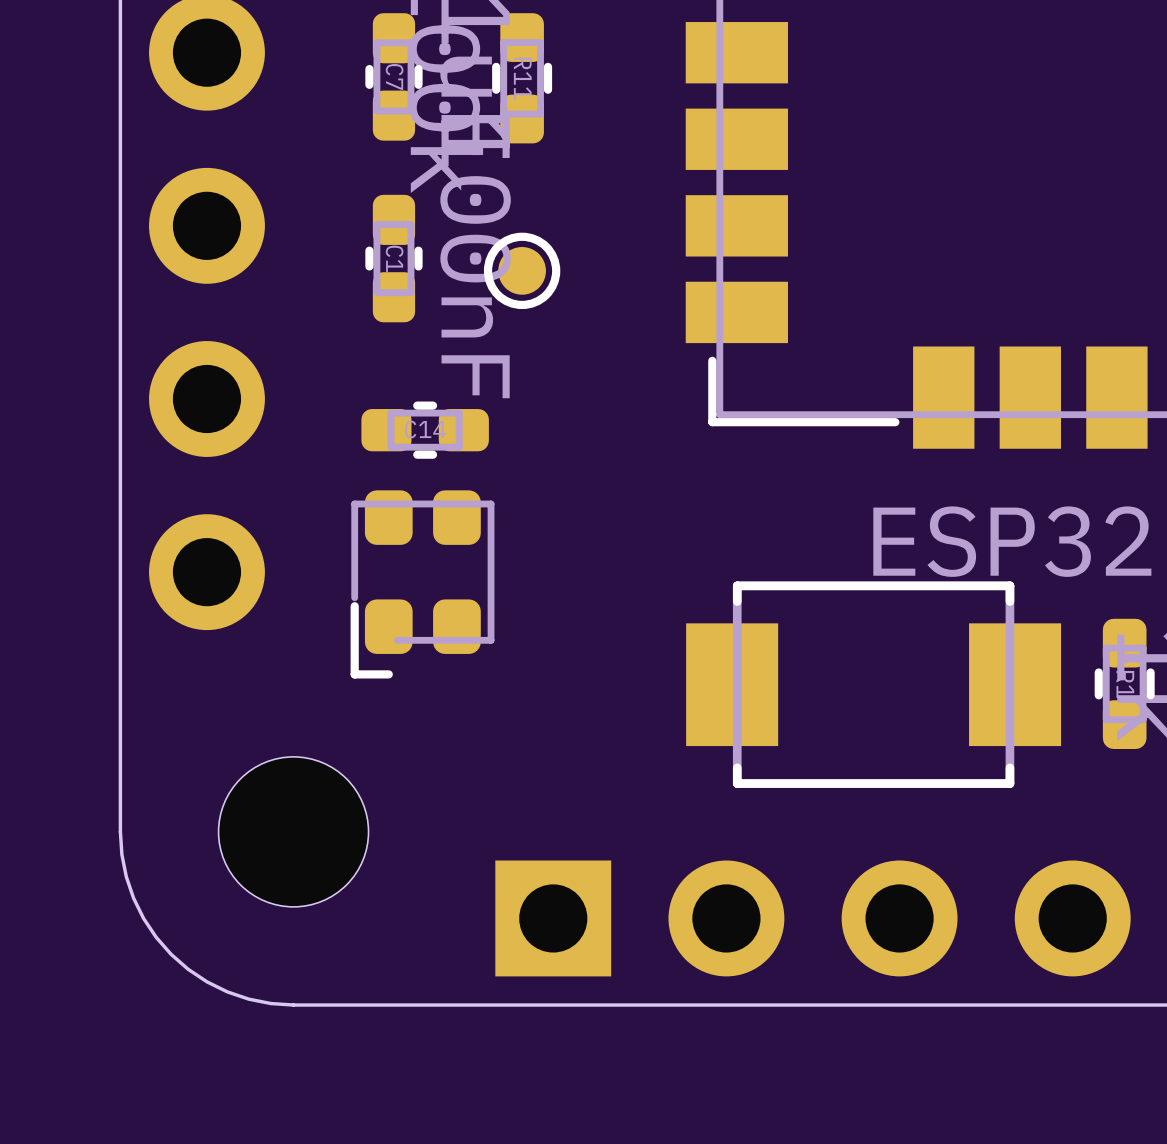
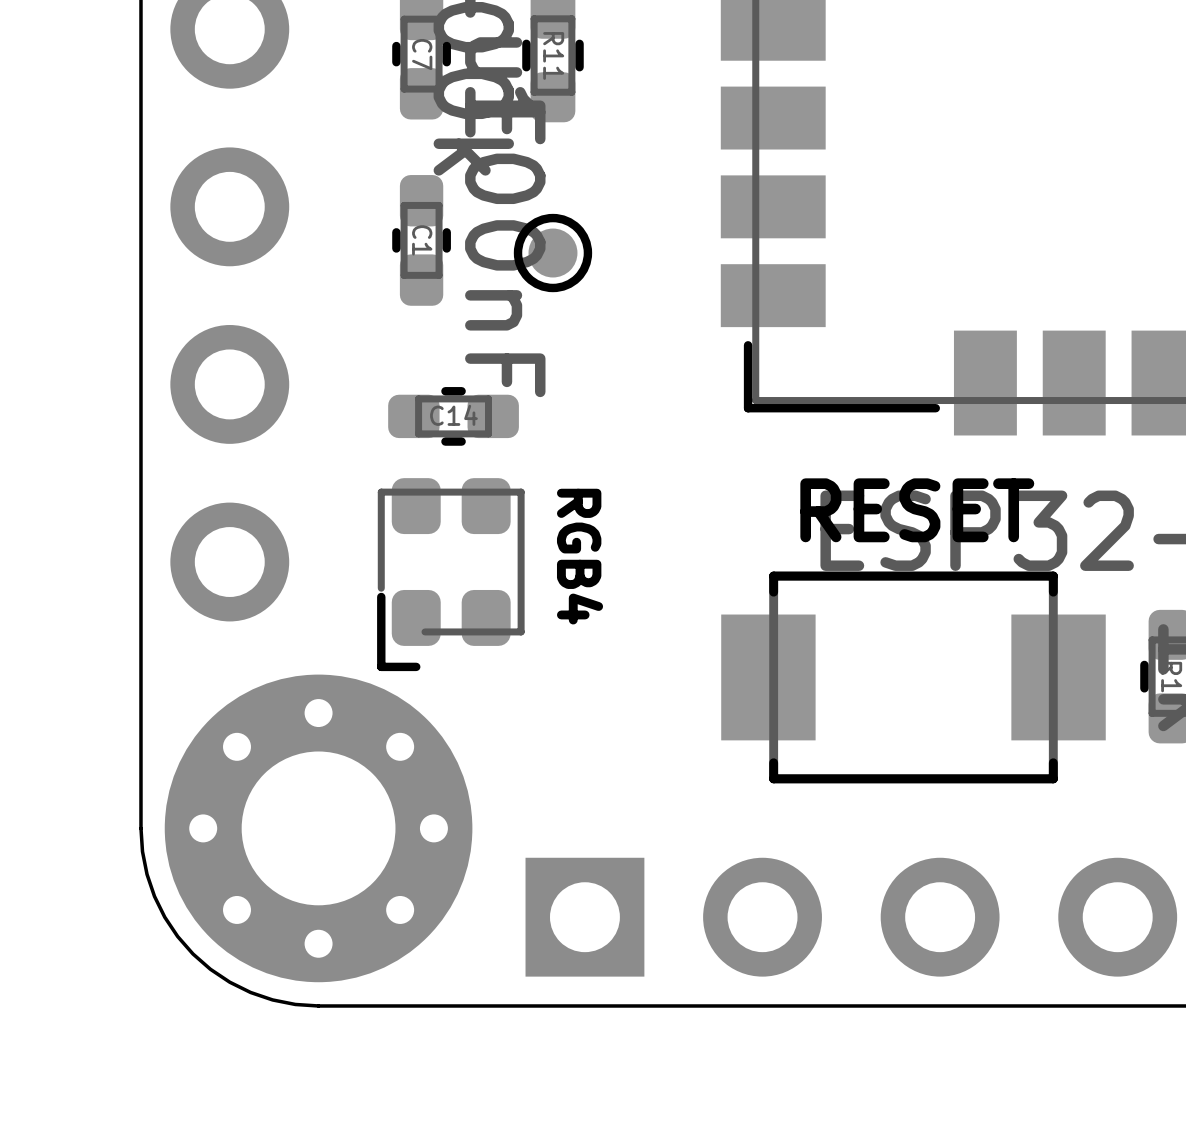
text: none -> RESET (917, 510)
text: none -> RGB4 (580, 556)
part footprint: [218, 756, 369, 907] -> [164, 674, 473, 983]

